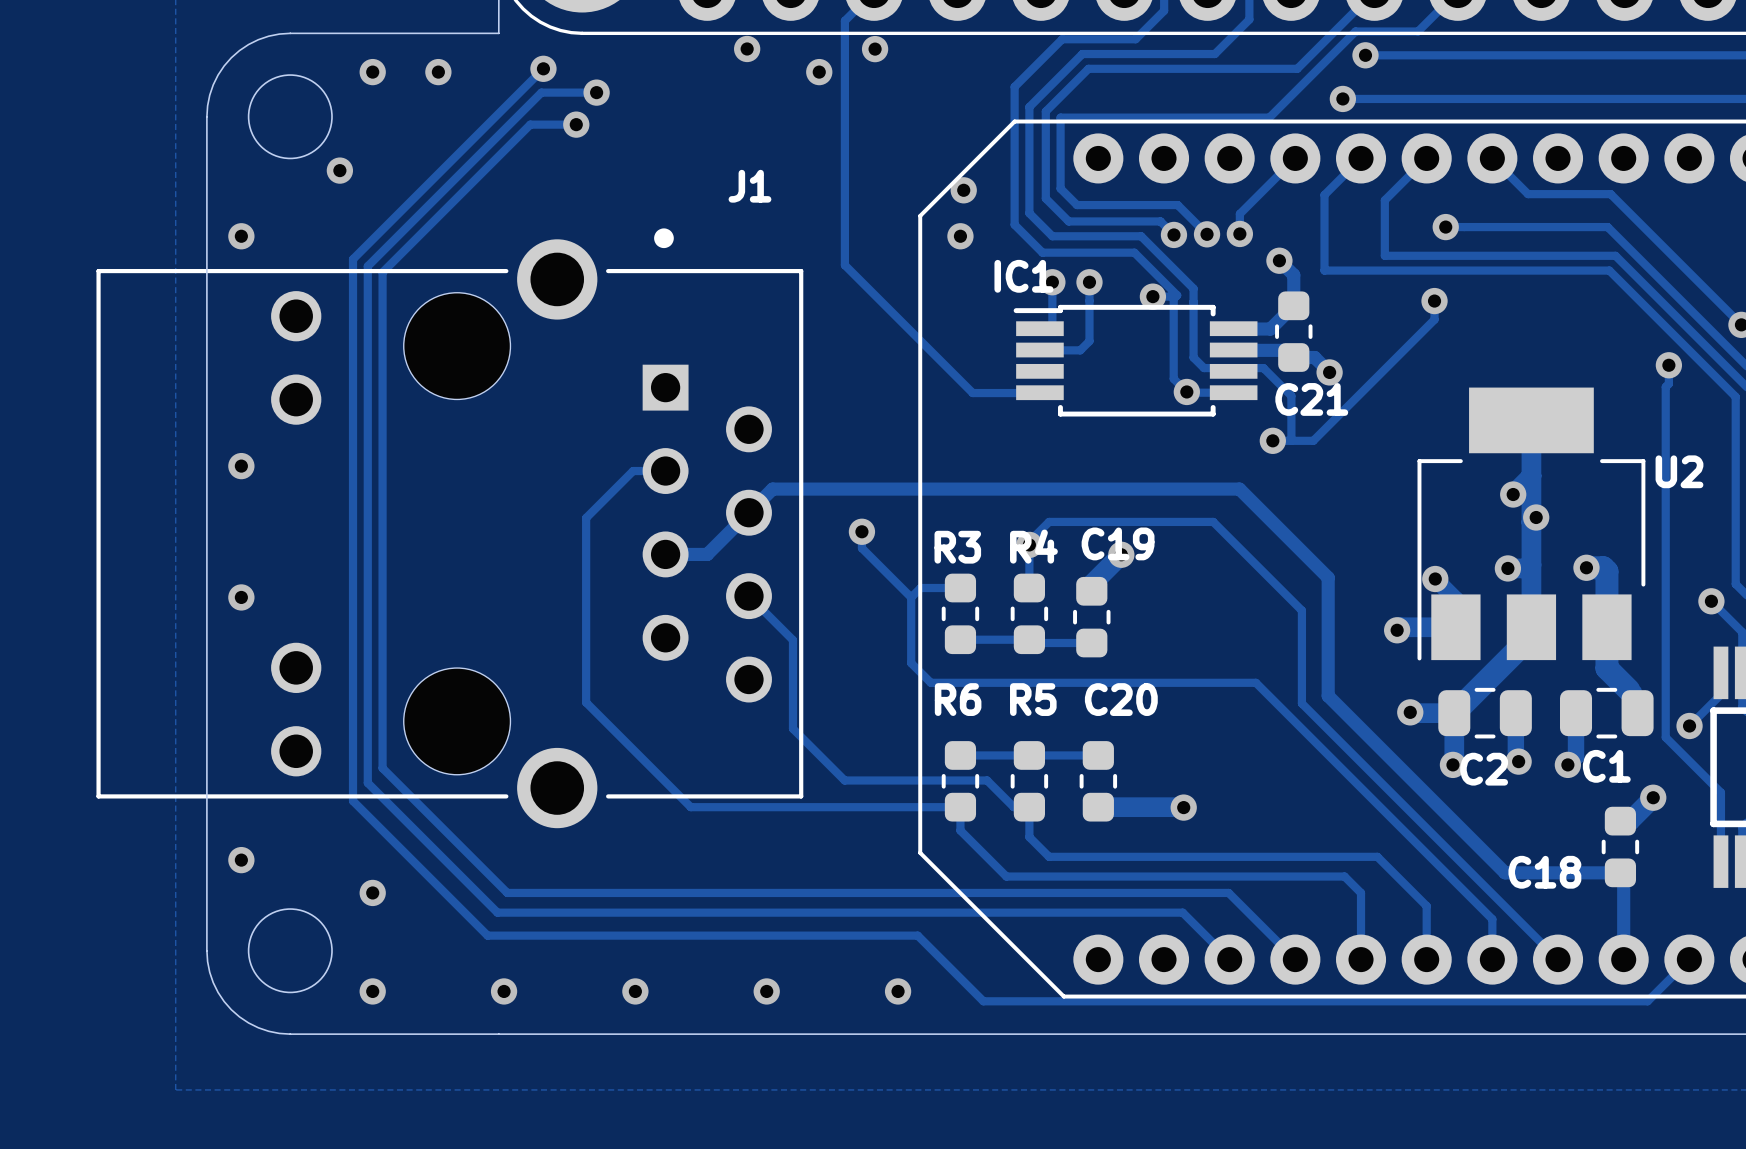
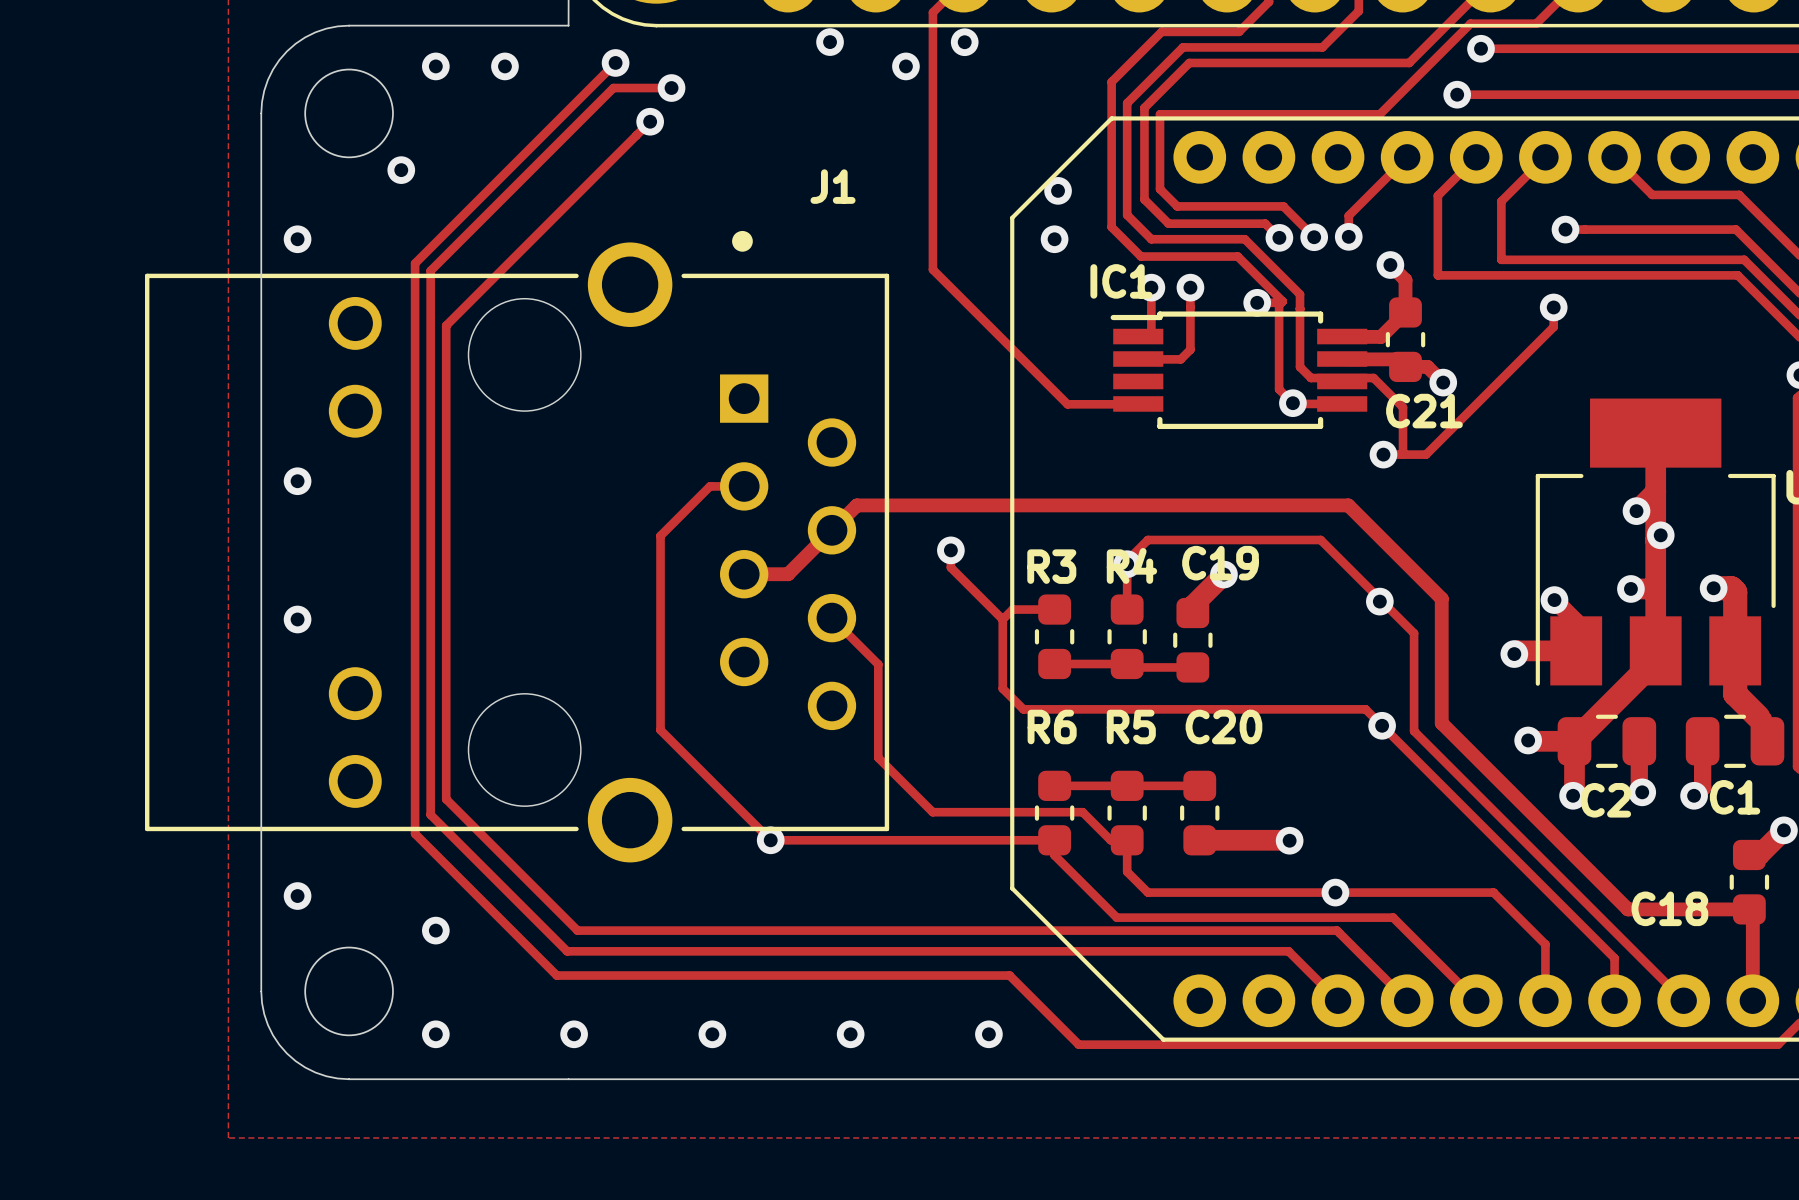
track: (576, 124) (530, 124) (382, 272) (382, 318) -> (650, 121) (446, 325)
via: none -> (1379, 601)
via: none -> (1382, 725)
via: none -> (770, 840)
track: (960, 821) (960, 830) (1006, 876) (1344, 876) (1361, 892) (1361, 959) -> (1054, 855) (1116, 917) (1393, 917) (1476, 1000)
via: none -> (1335, 892)

